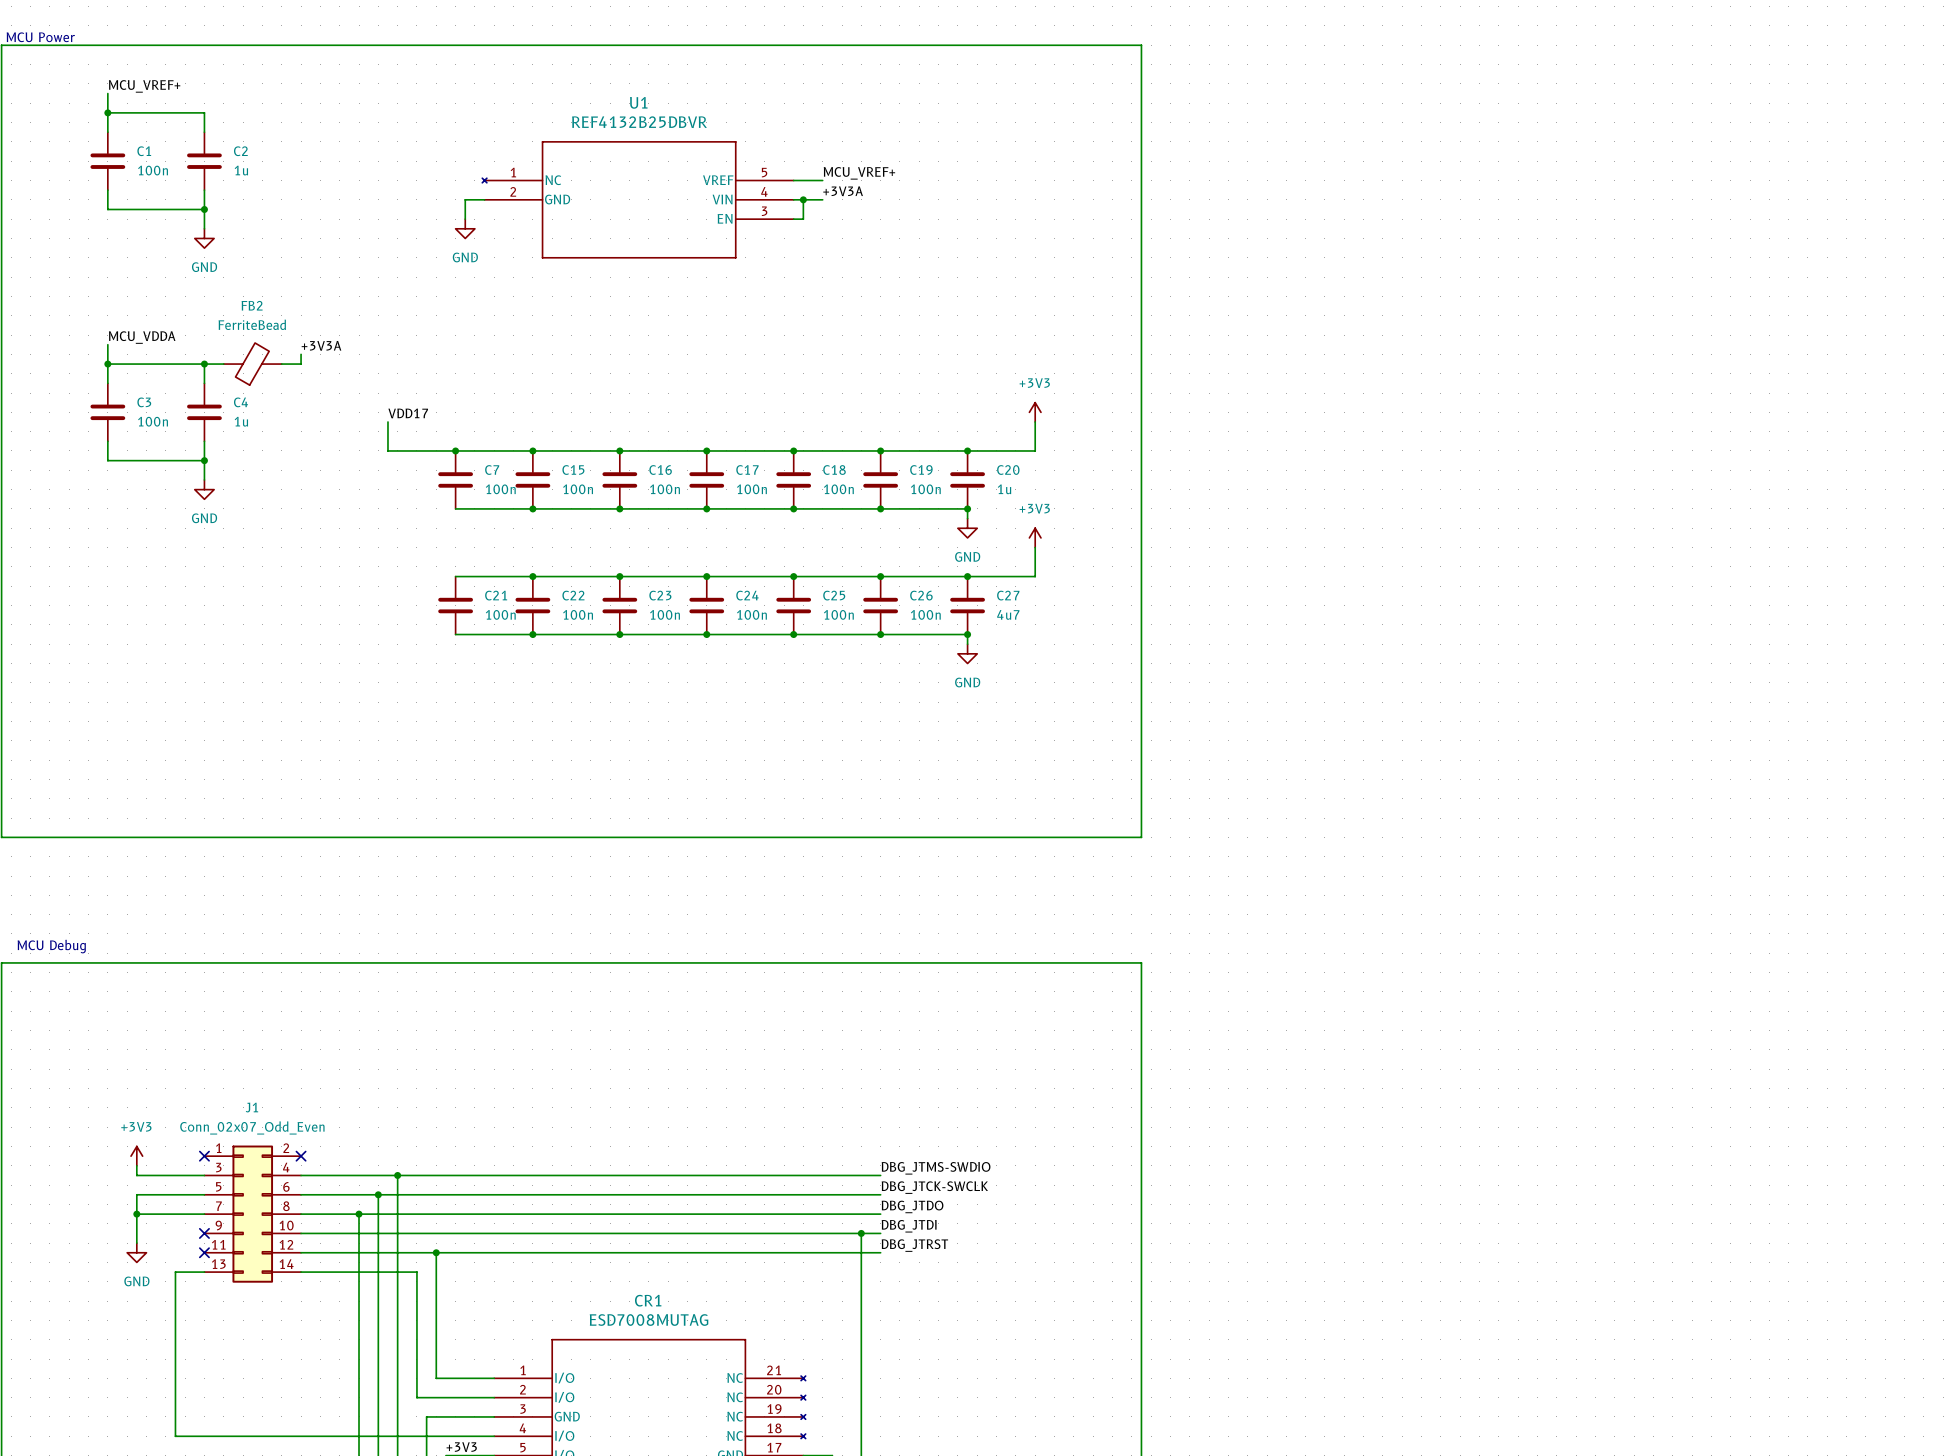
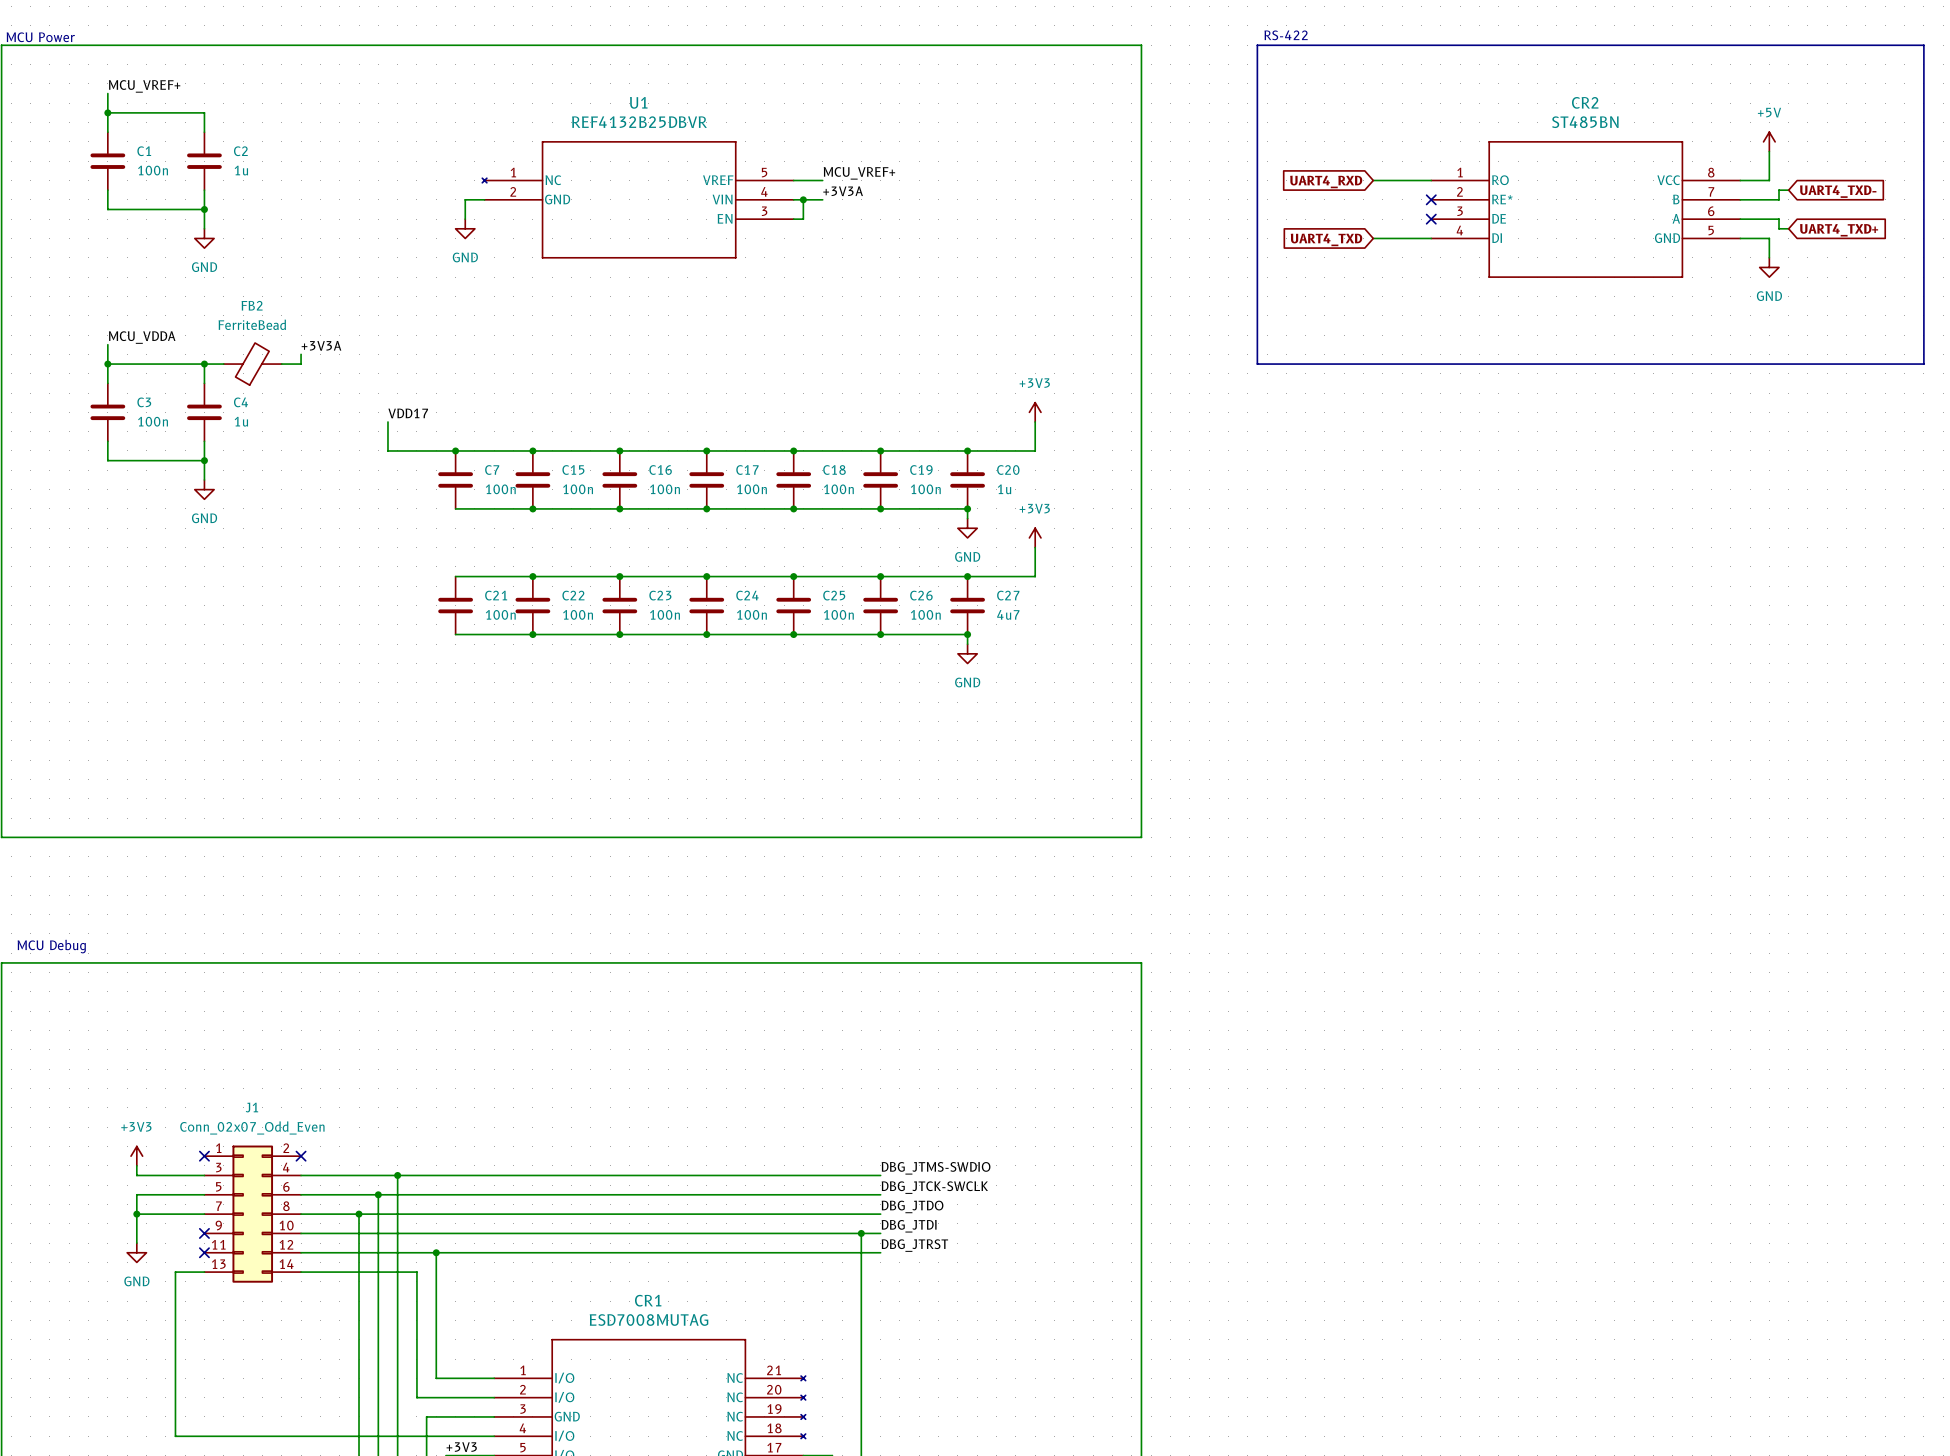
text: none -> RS-422 (1286, 35)
line: none -> (1257, 45) (1923, 45) (1923, 364) (1257, 364) (1257, 45)
power symbol: none -> +5V (1769, 141)
wire: none -> (1769, 151) (1769, 180) (1740, 180)
wire: none -> (1373, 180) (1431, 180)
global label: none -> UART4_RXD (1326, 181)
wire: none -> (1788, 190) (1779, 190) (1779, 199) (1740, 199)
global label: none -> UART4_TXD- (1838, 191)
no-connect mark: none -> (1431, 199)
CR2: none -> ST485BN (1585, 209)
no-connect mark: none -> (1431, 219)
wire: none -> (1740, 219) (1779, 219) (1779, 228) (1788, 228)
global label: none -> UART4_TXD+ (1839, 230)
wire: none -> (1373, 238) (1431, 238)
wire: none -> (1740, 238) (1769, 238) (1769, 257)
global label: none -> UART4_TXD (1326, 239)
power symbol: none -> GND (1769, 267)

